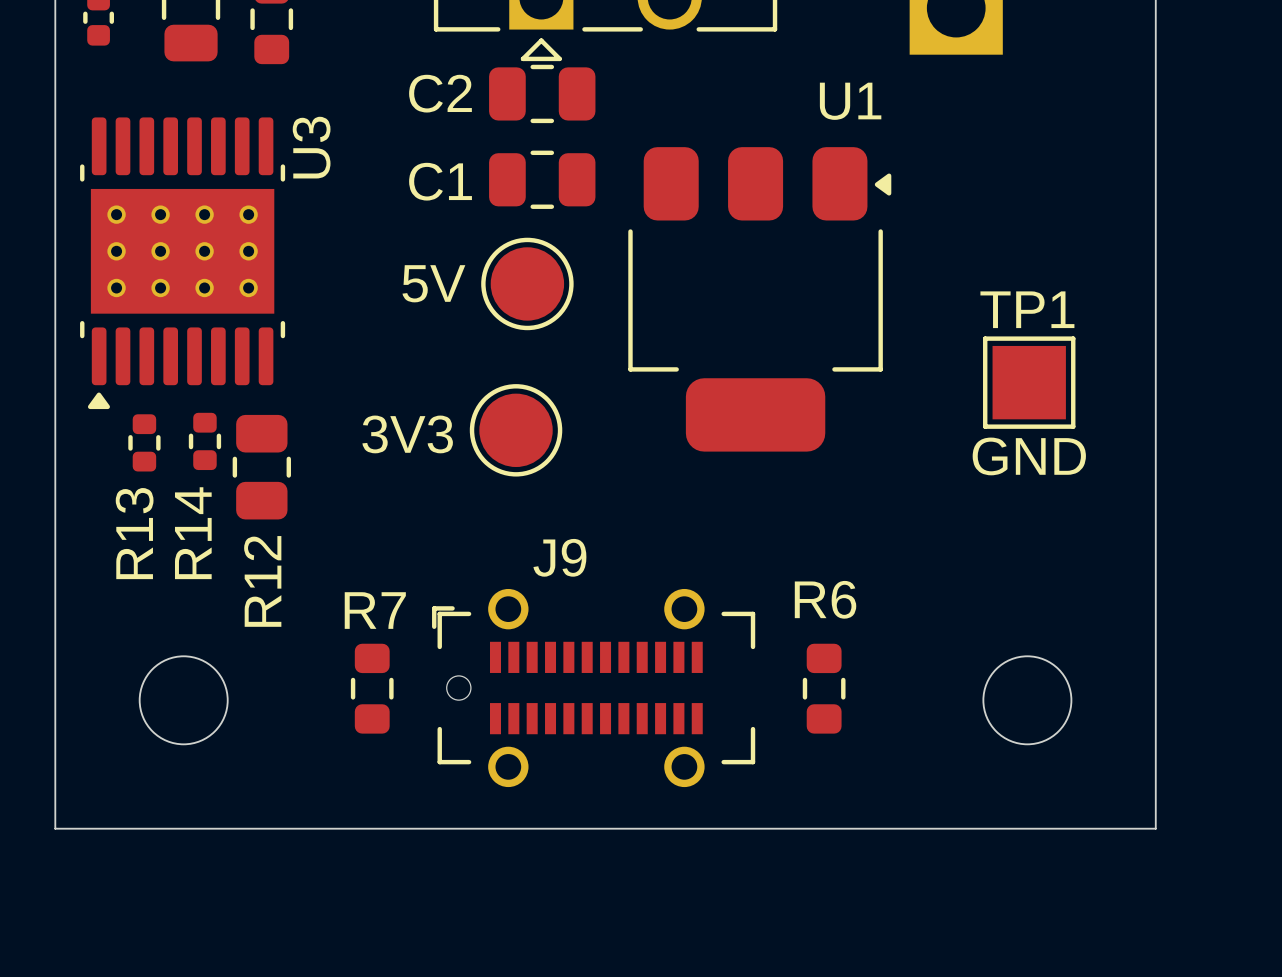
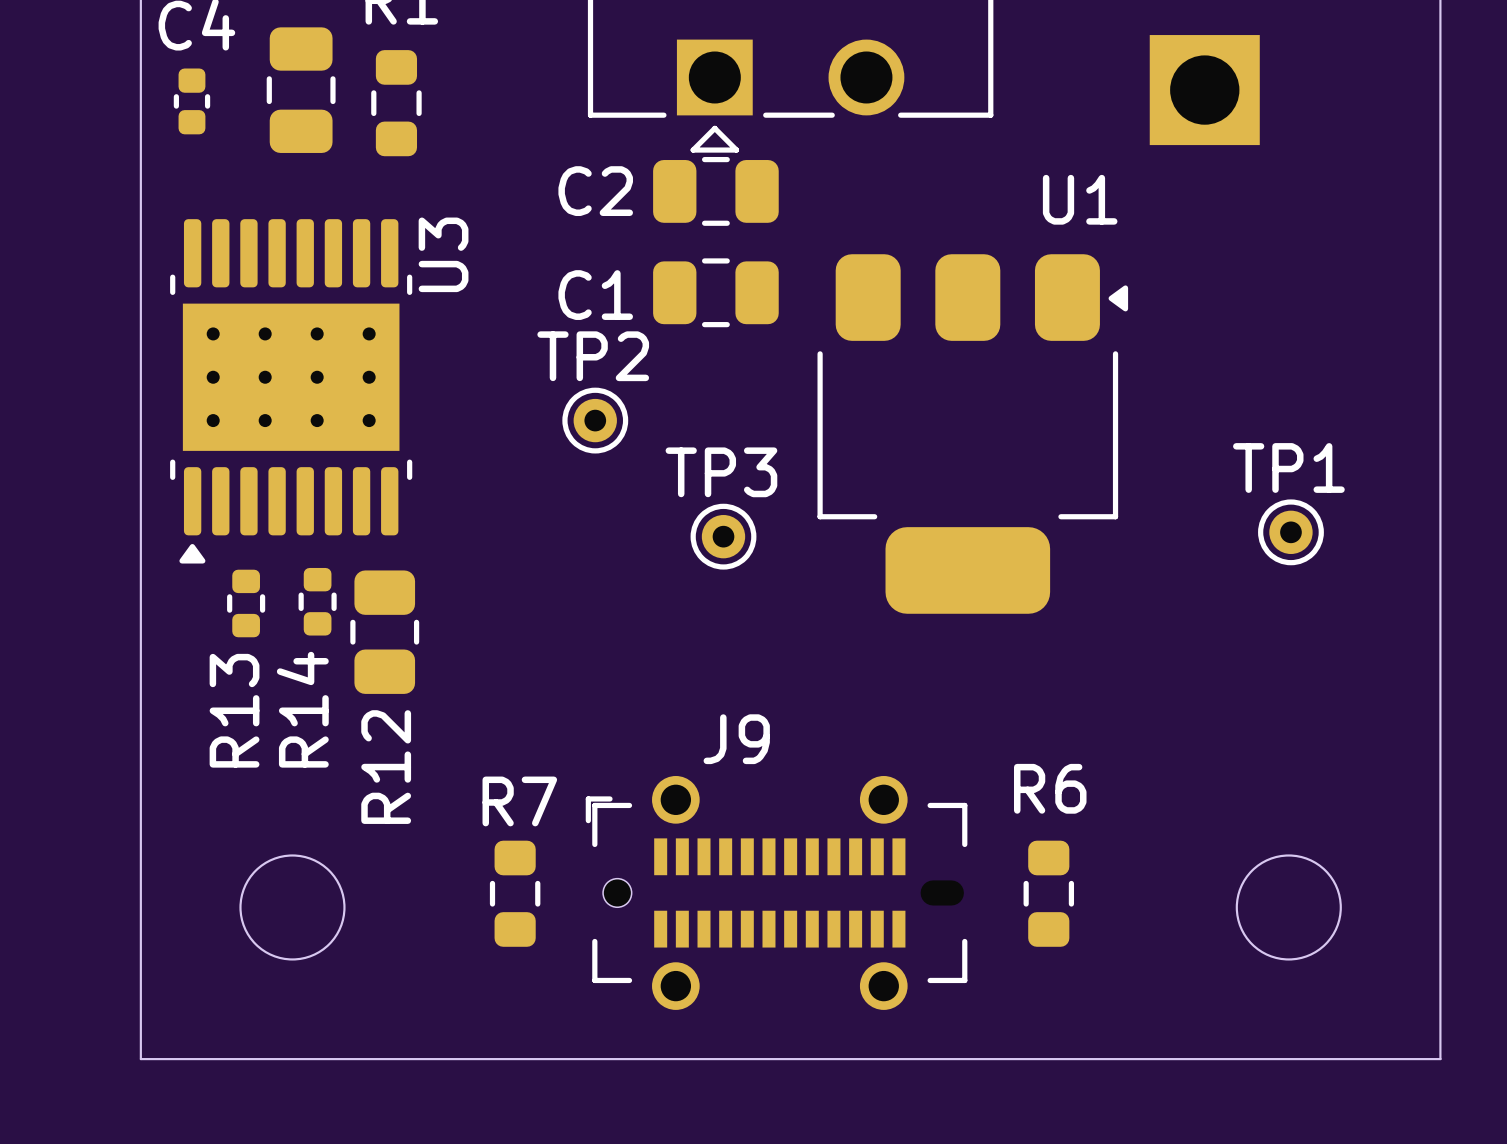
part: 5V (527, 283) -> none
TP2: none -> (595, 420)
TP1 footprint: [983, 336, 1076, 429] -> [1258, 499, 1324, 566]
TP3: none -> (723, 536)
part: 3V3 (516, 430) -> none
TP1 value: GND (1029, 456) -> none

